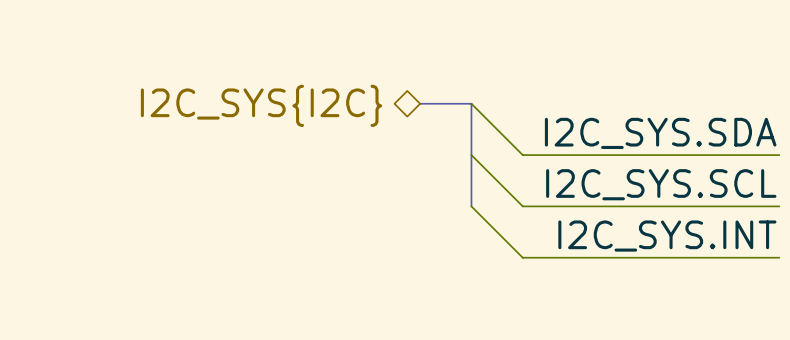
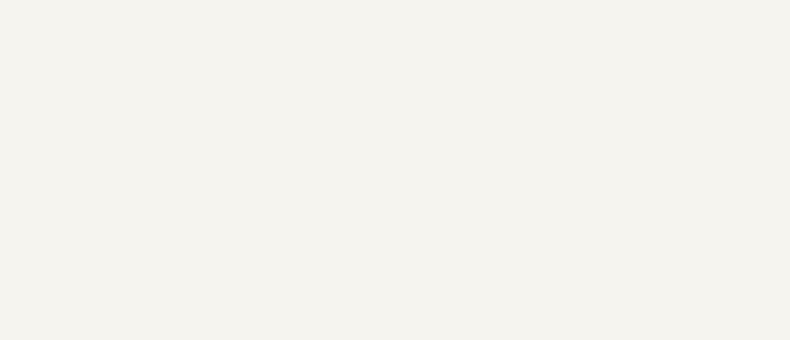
bus: (420, 103) (471, 103) (471, 206) -> none
wire: (471, 103) (522, 155) (779, 155) -> none
hierarchical label: I2C_SYS{I2C} (261, 105) -> none
label: I2C_SYS.SDA (660, 133) -> none
wire: (471, 155) (522, 206) (779, 206) -> none
label: I2C_SYS.SCL (661, 184) -> none
wire: (471, 206) (522, 257) (779, 257) -> none
label: I2C_SYS.INT (667, 236) -> none

